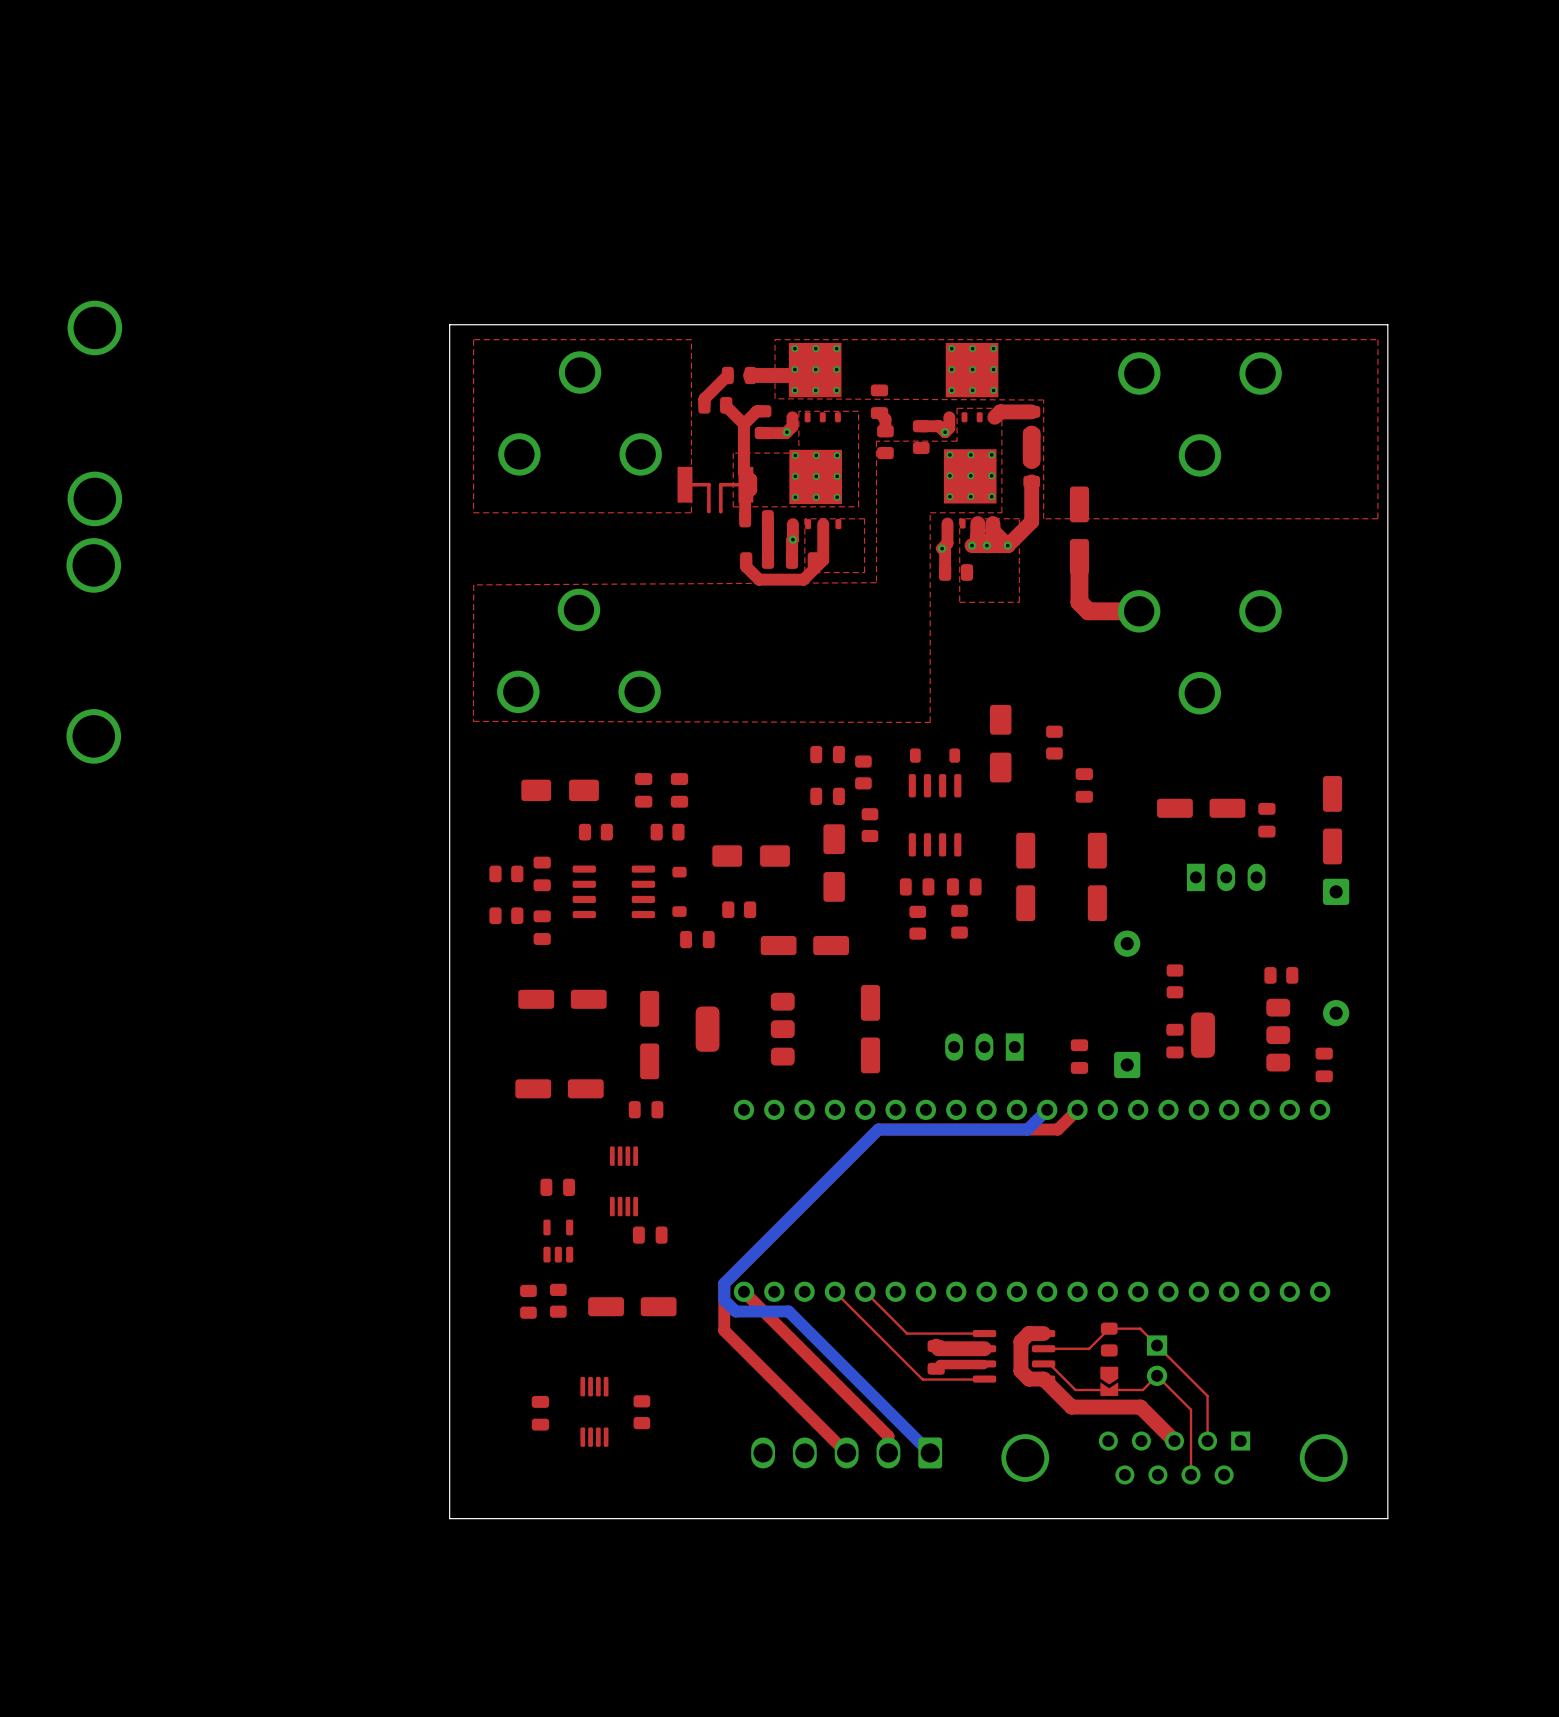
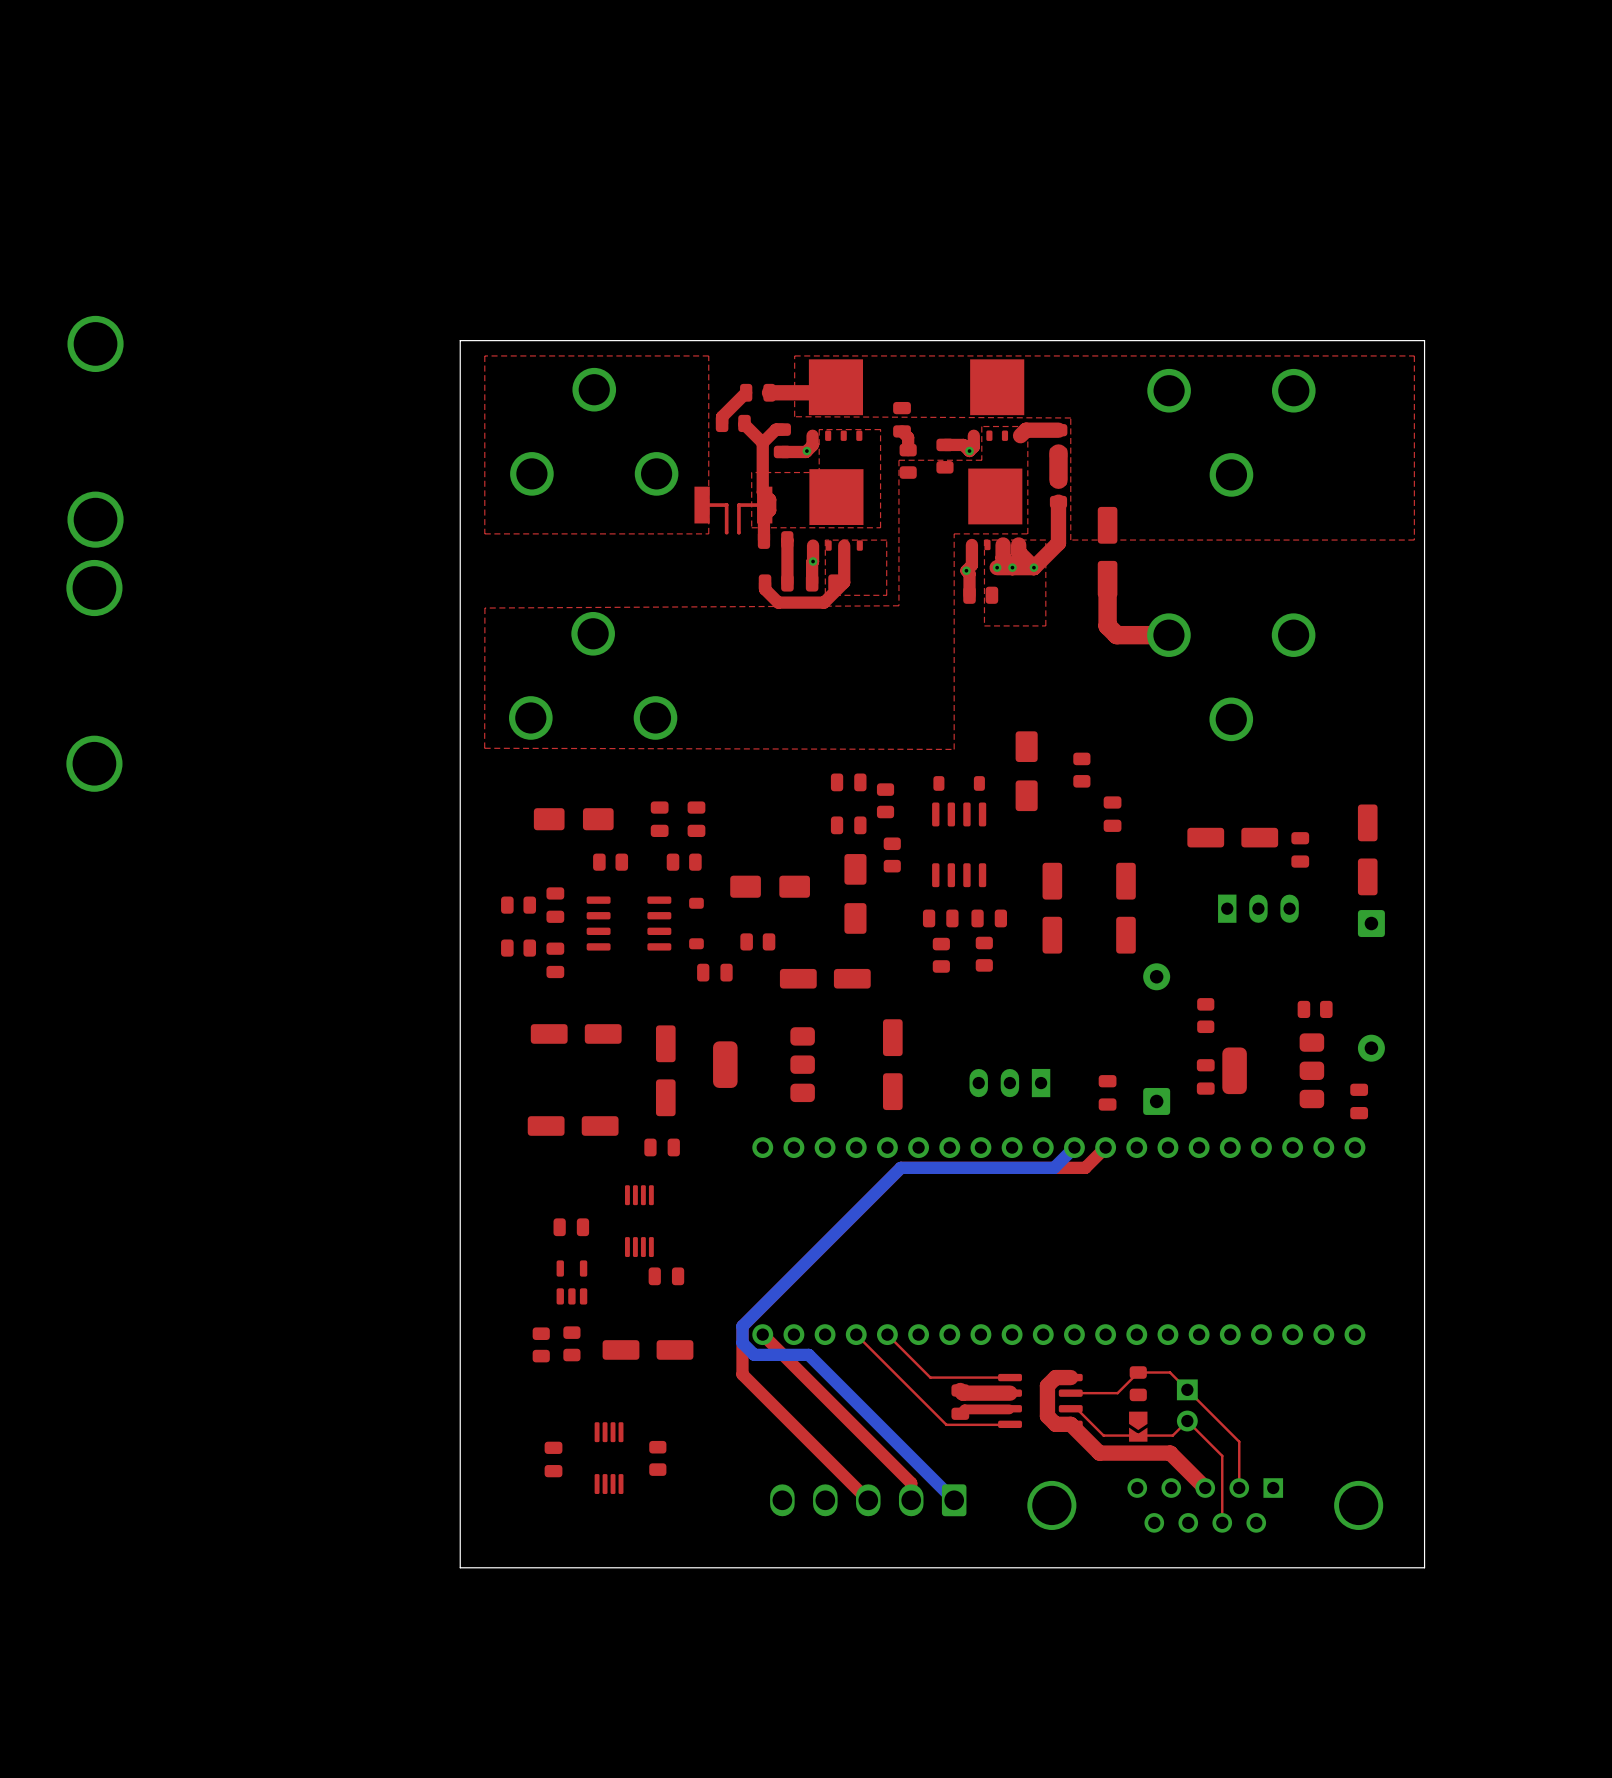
part footprint: [788, 342, 842, 423] -> [808, 359, 864, 441]
part footprint: [945, 342, 999, 423] -> [970, 359, 1025, 441]
part footprint: [789, 449, 842, 530] -> [809, 469, 864, 551]
part footprint: [943, 449, 997, 529] -> [968, 468, 1023, 551]

